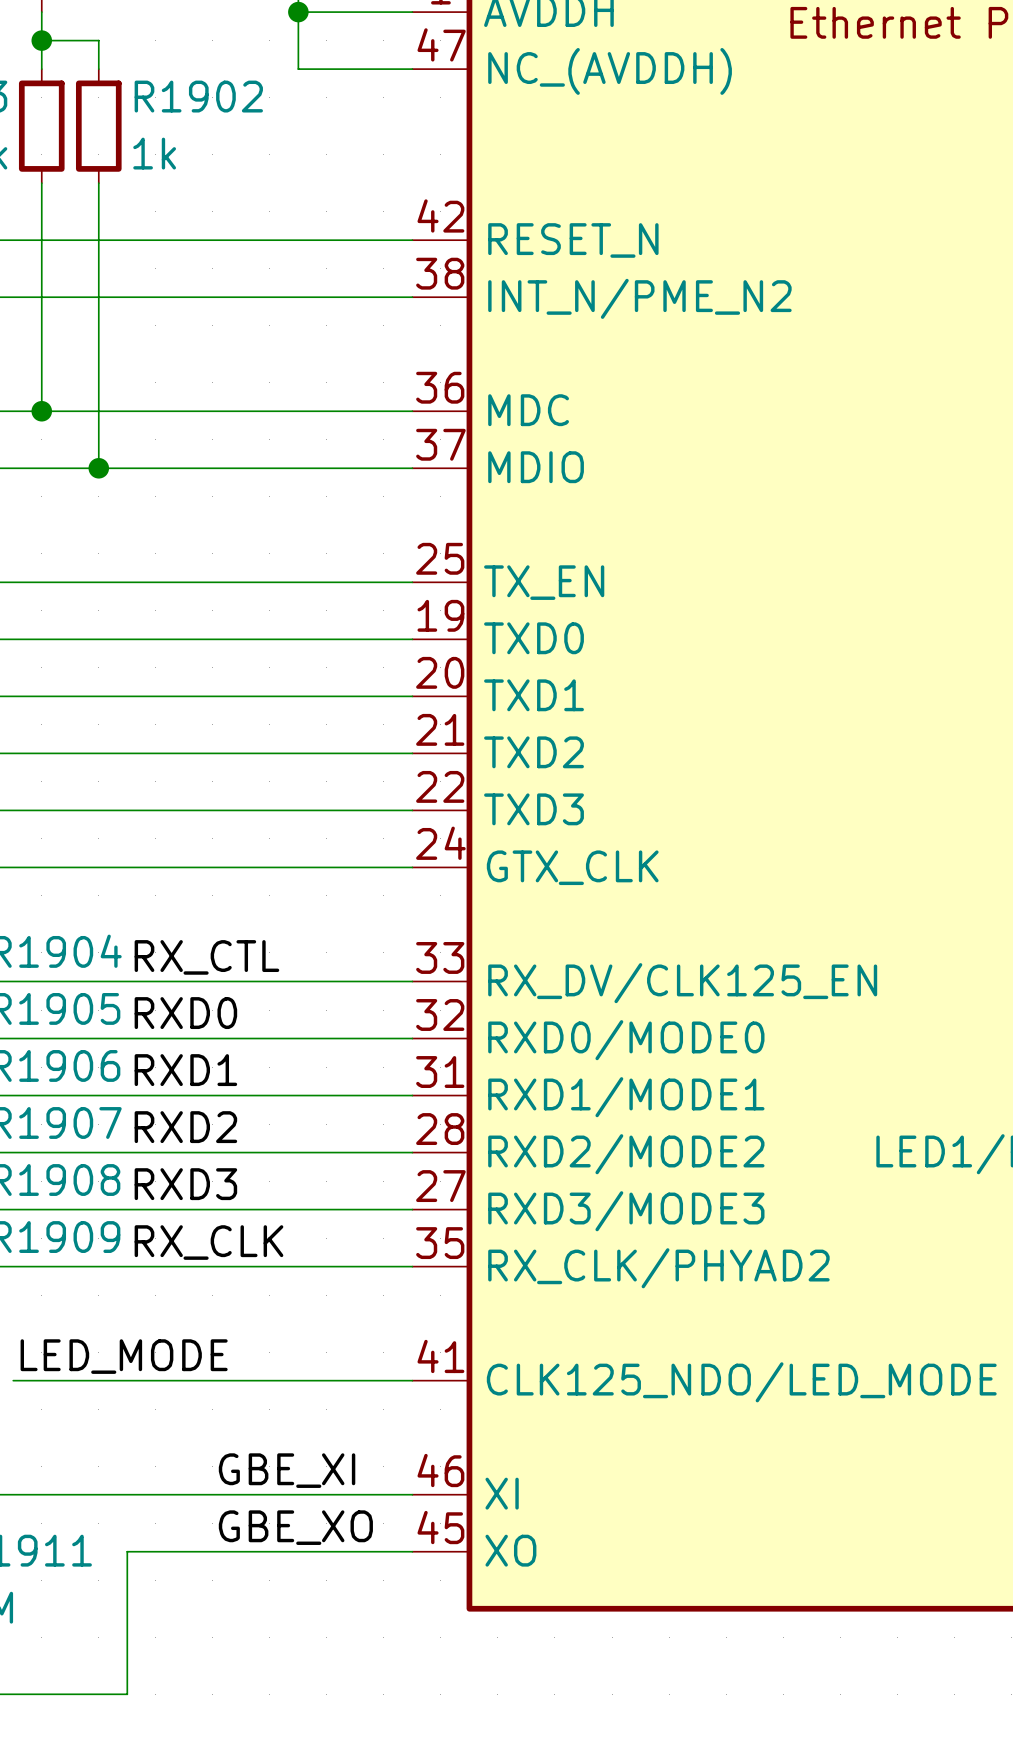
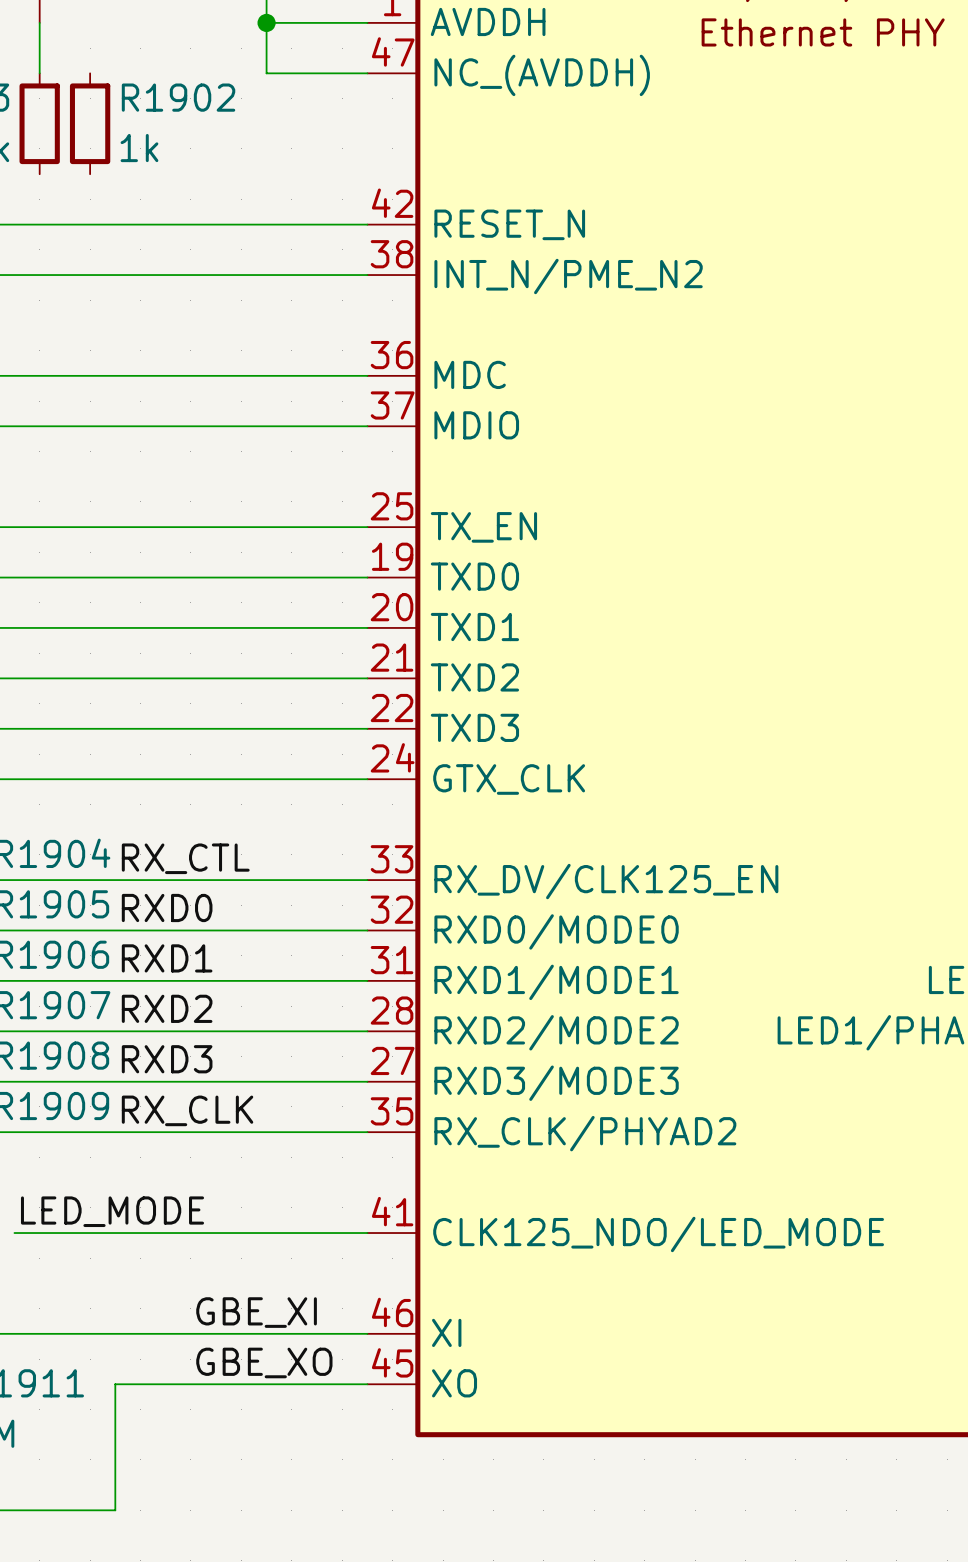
wire: (41, 40) (98, 40) (98, 69) -> none
junction: (41, 40) -> none
wire: (41, 183) (41, 411) -> none
wire: (98, 183) (98, 468) -> none
junction: (41, 411) -> none
junction: (98, 468) -> none

